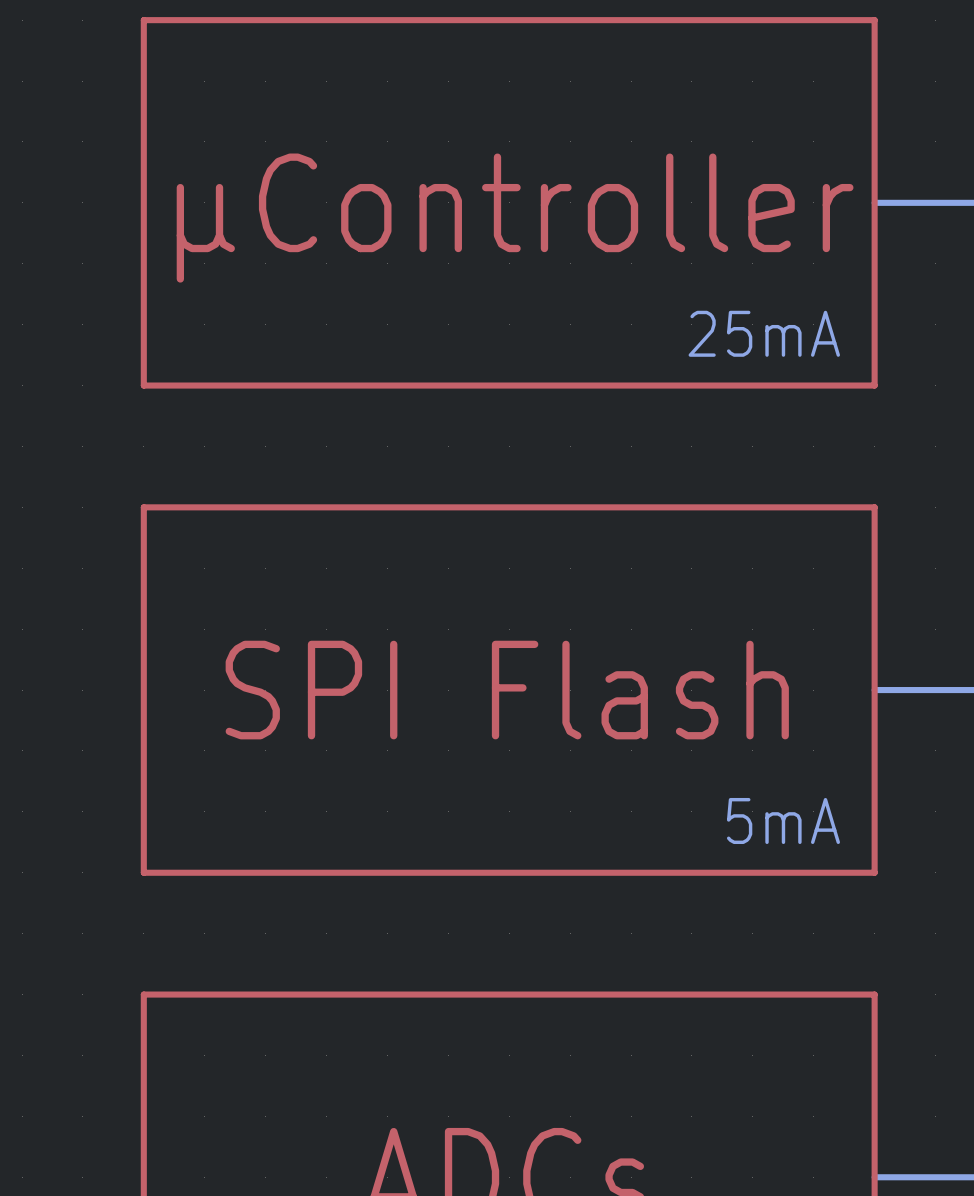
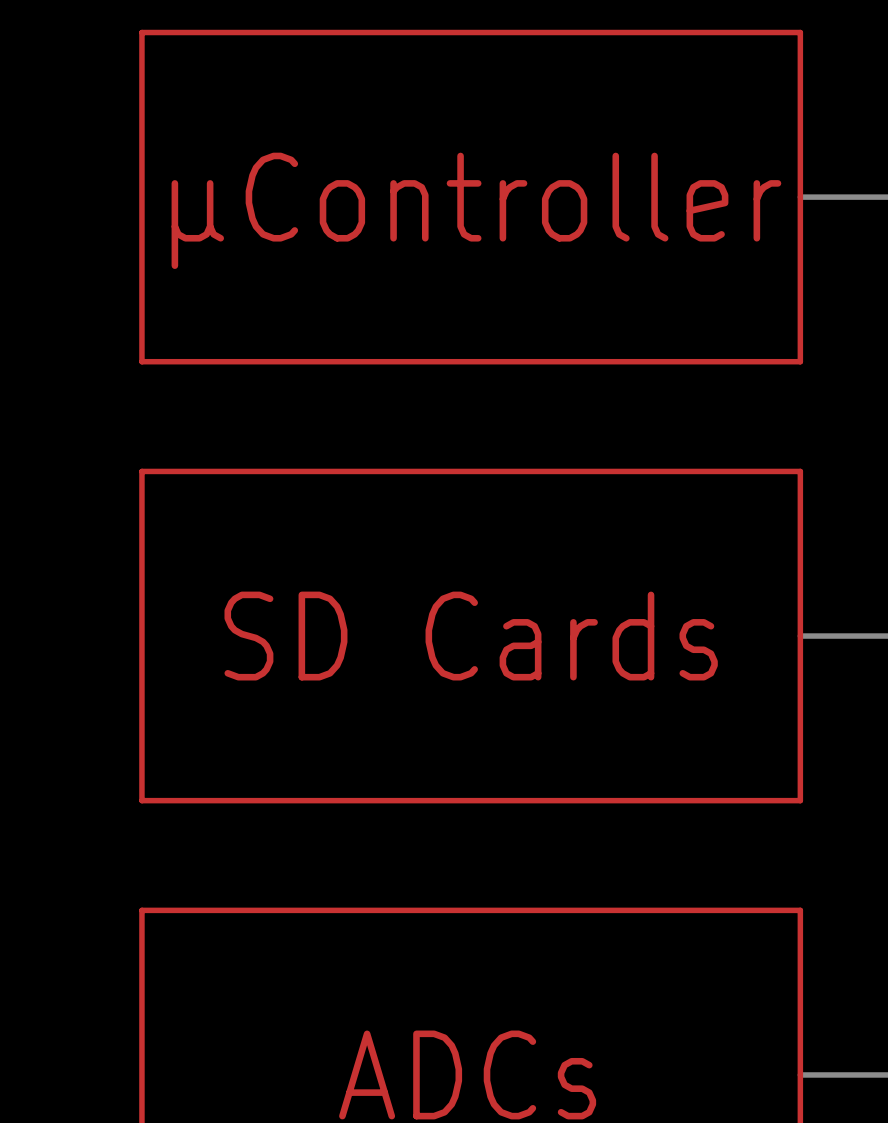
text: 25mA (764, 333) -> none
text: SPI Flash (507, 690) -> SD Cards (471, 636)
text: 5mA (783, 820) -> none

